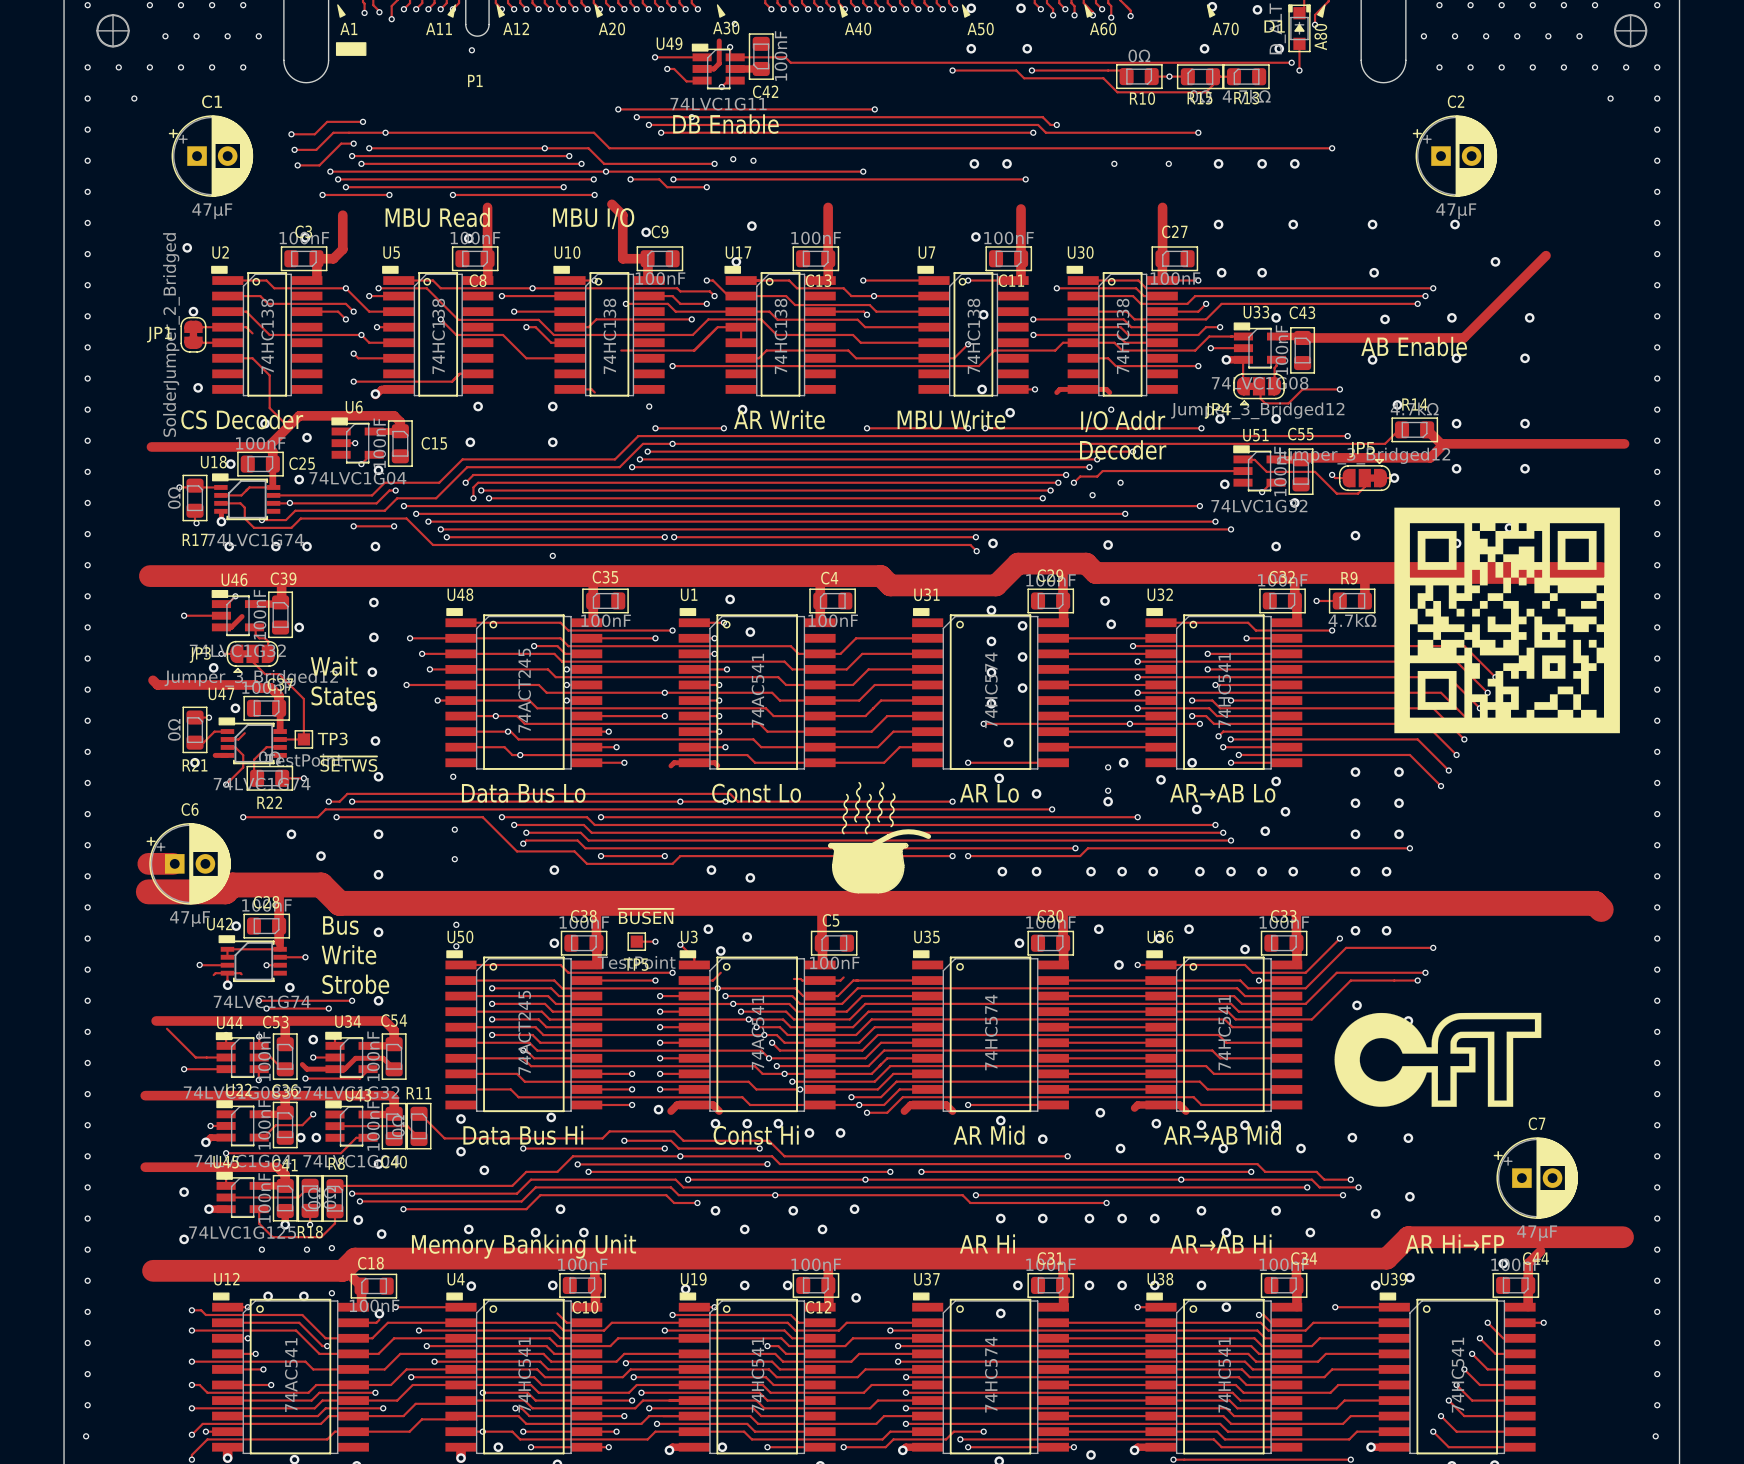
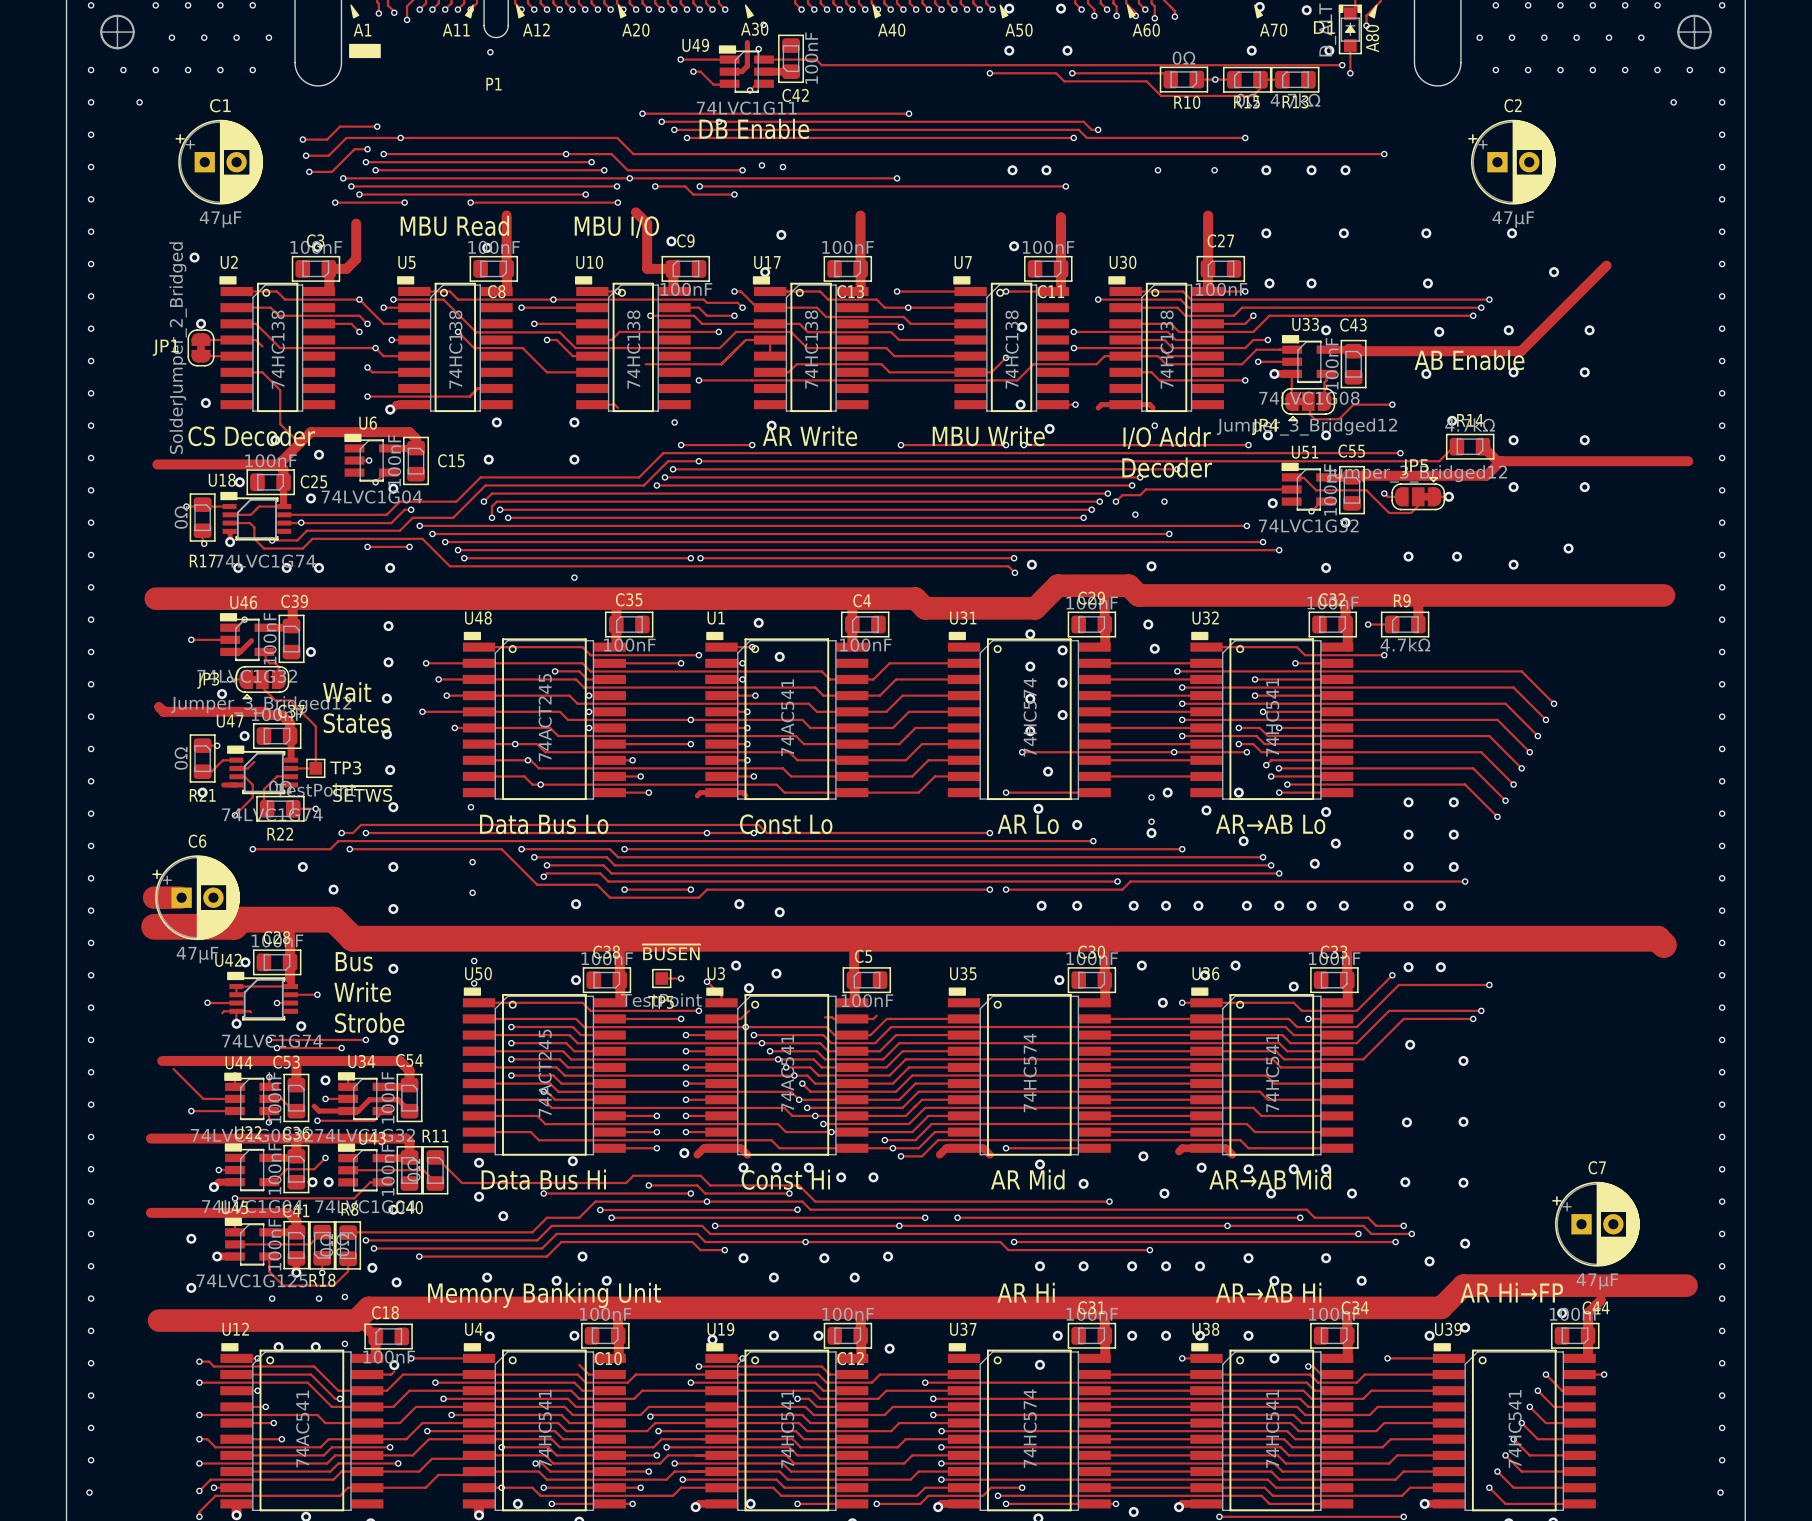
drawing: [1394, 507, 1620, 734] -> none
drawing: [828, 781, 932, 894] -> none
drawing: [1334, 1012, 1542, 1107] -> none

